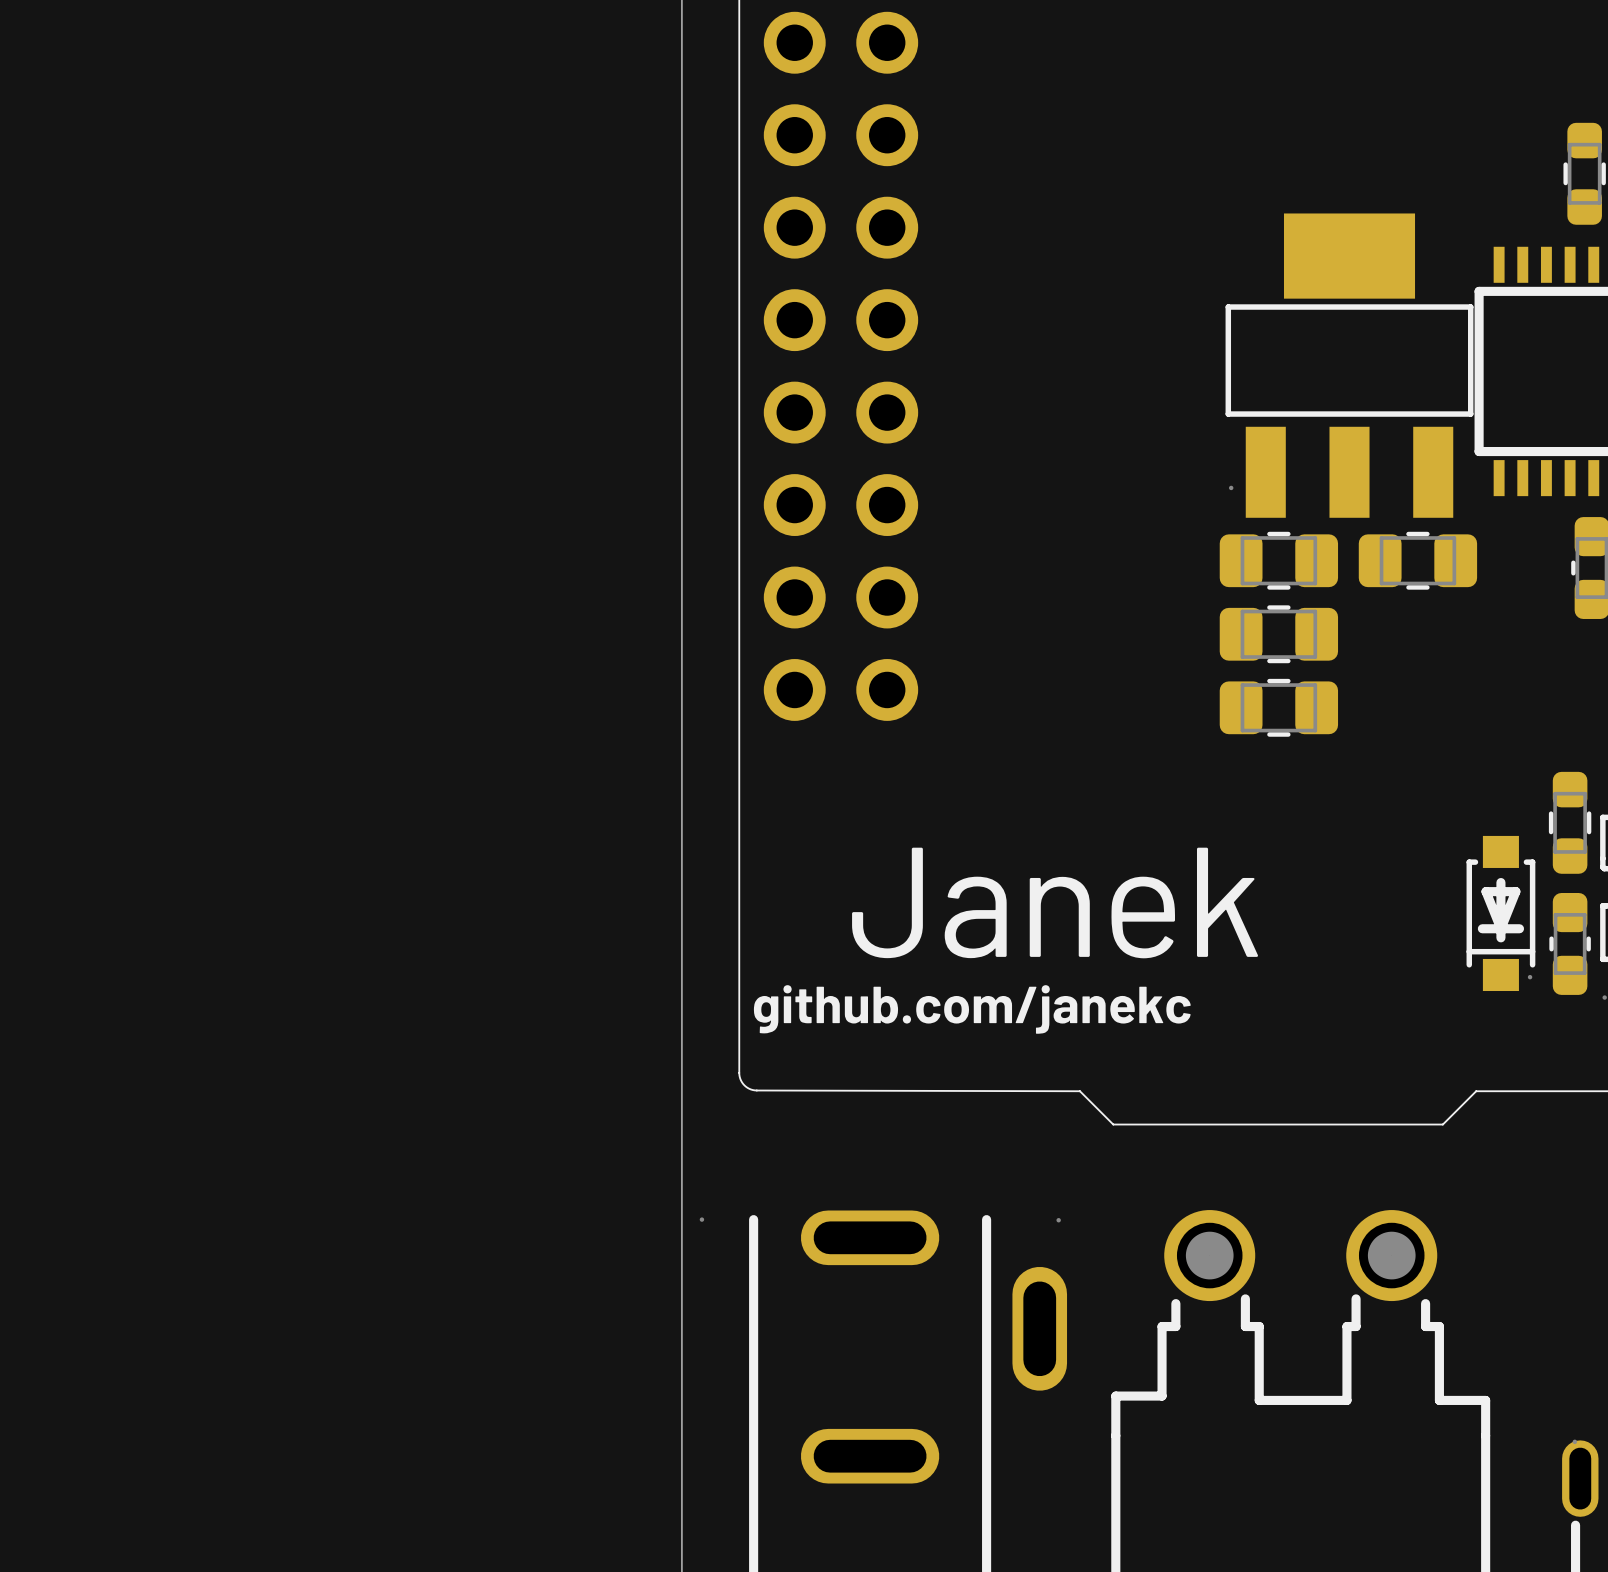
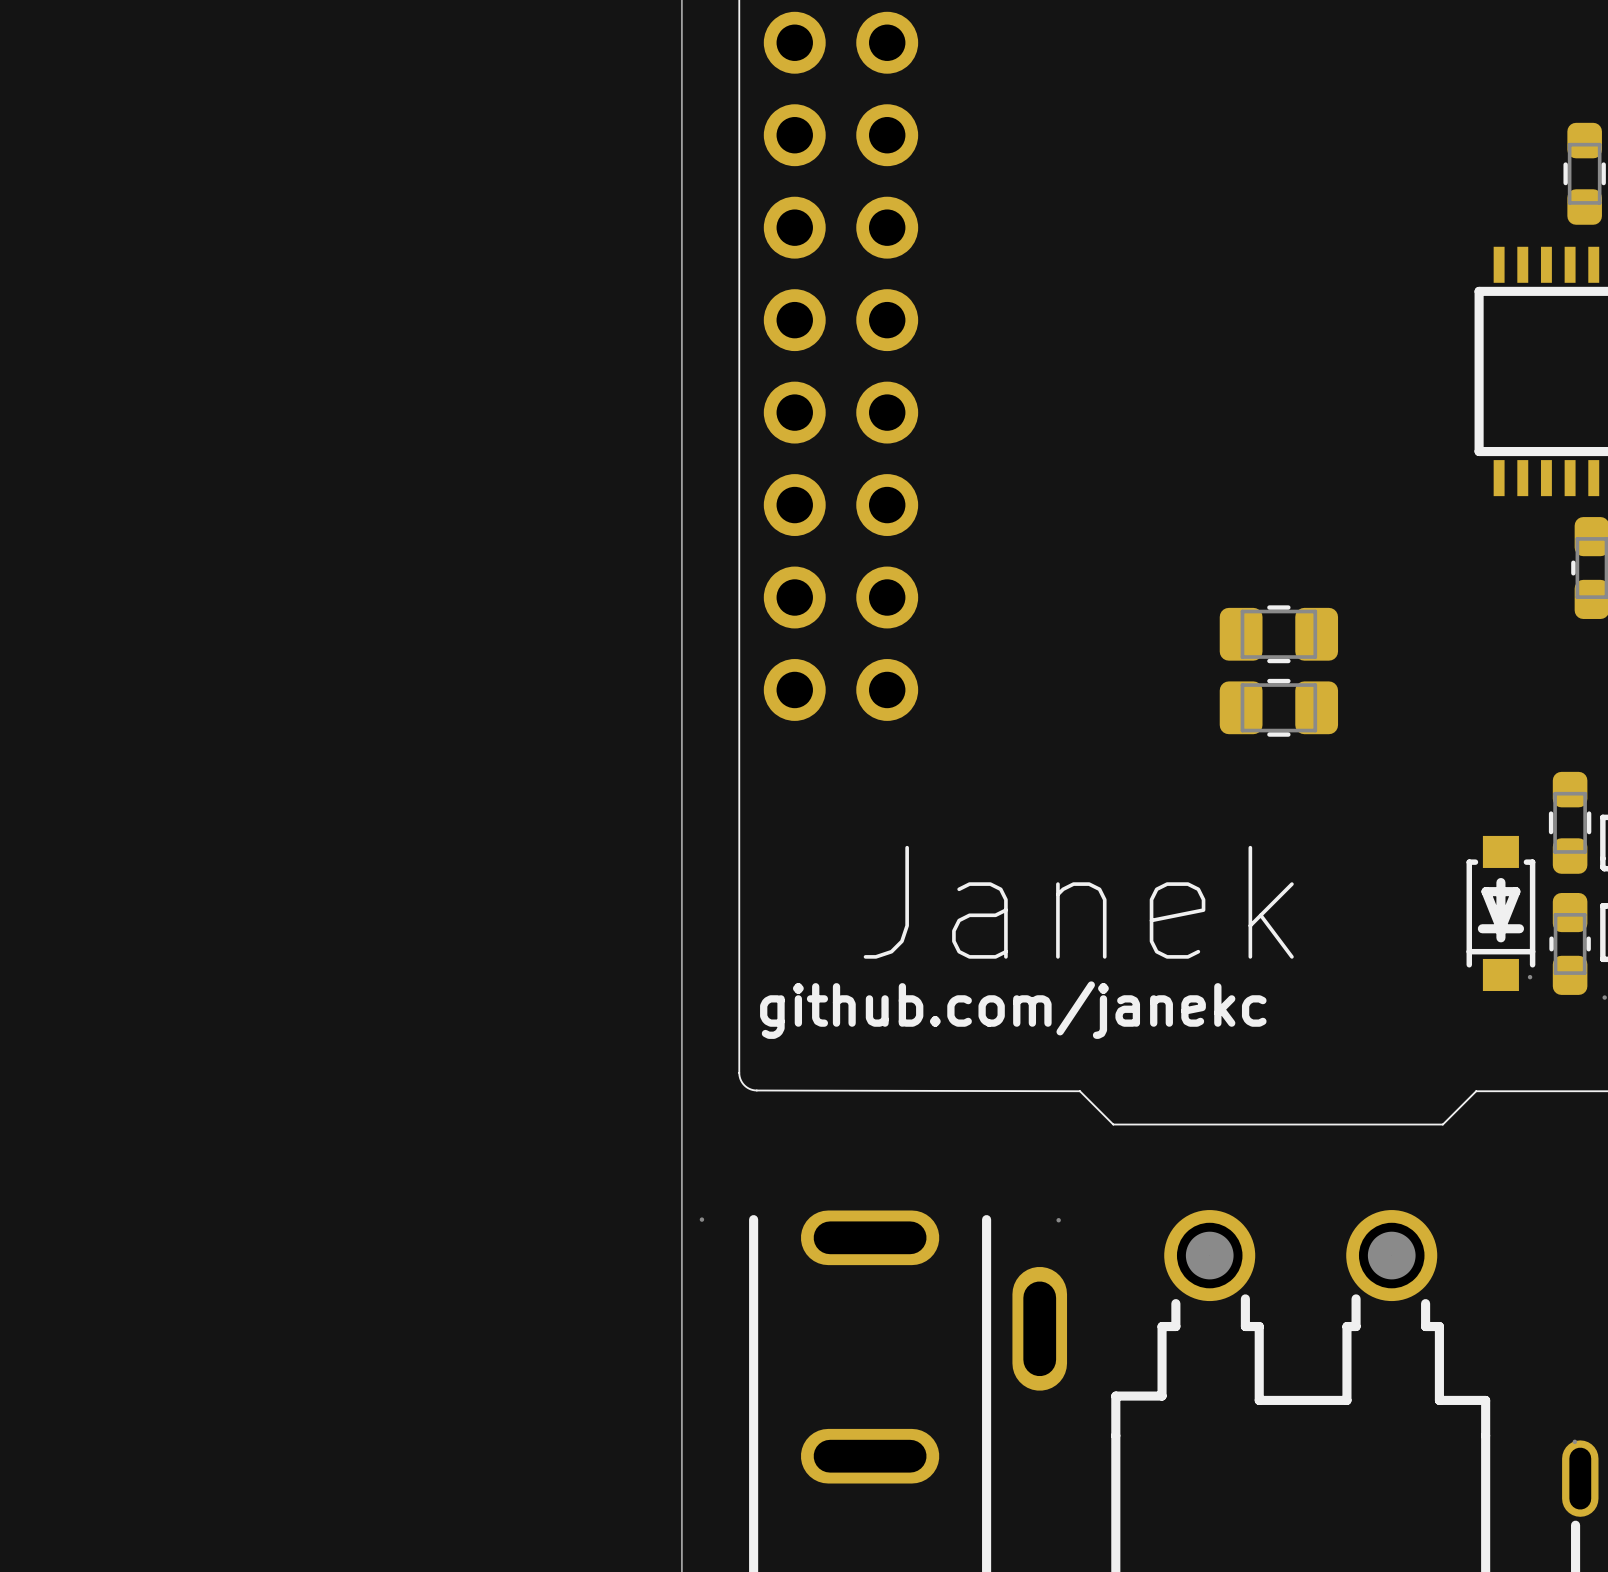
part: (1349, 365) -> none
part: (1278, 560) -> none
part: (1417, 560) -> none

